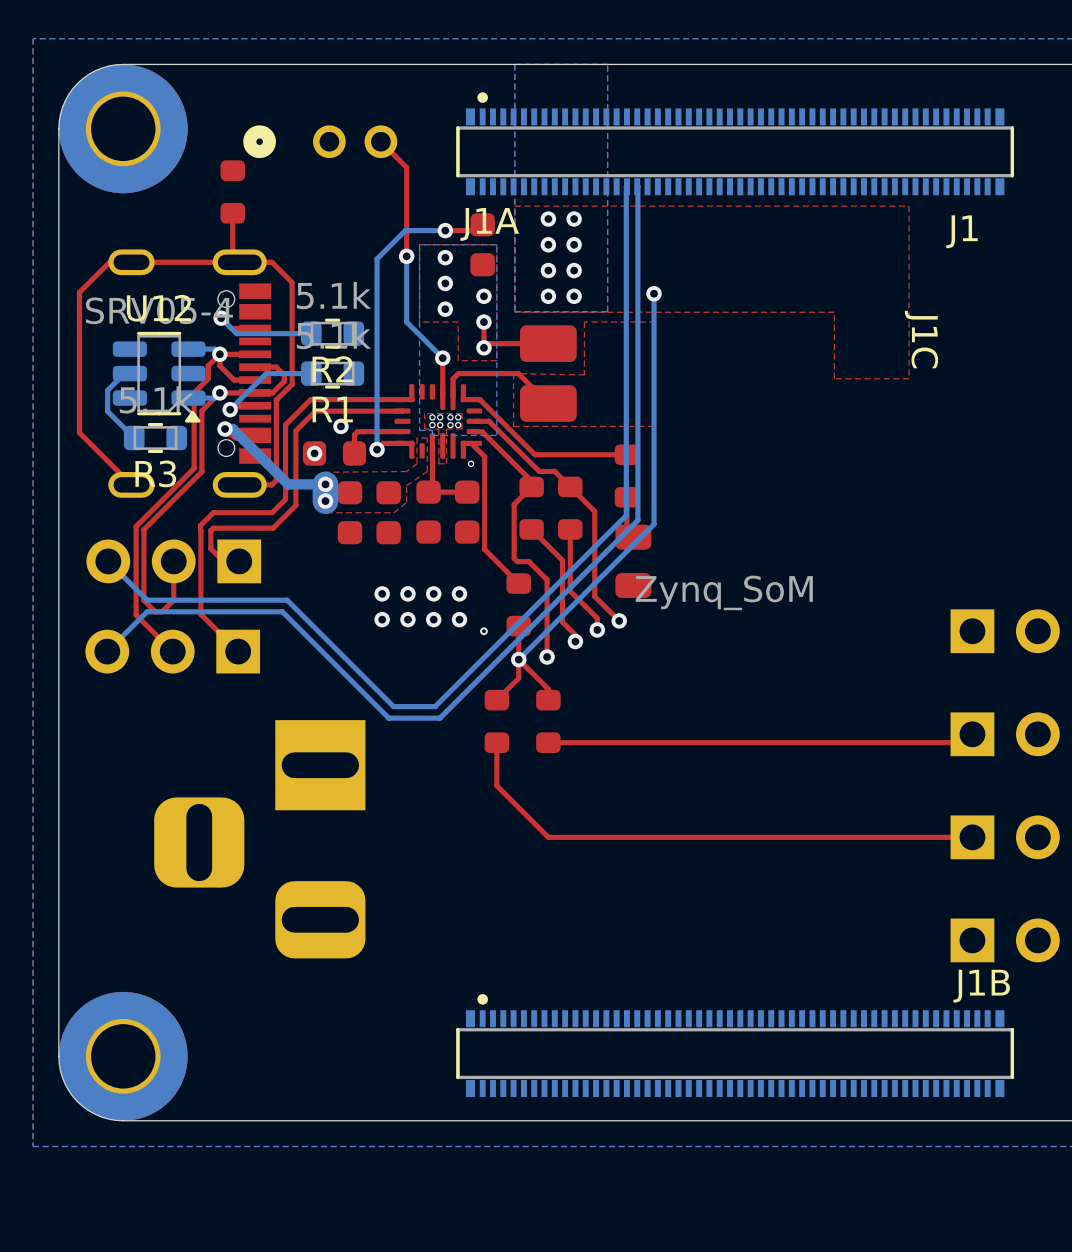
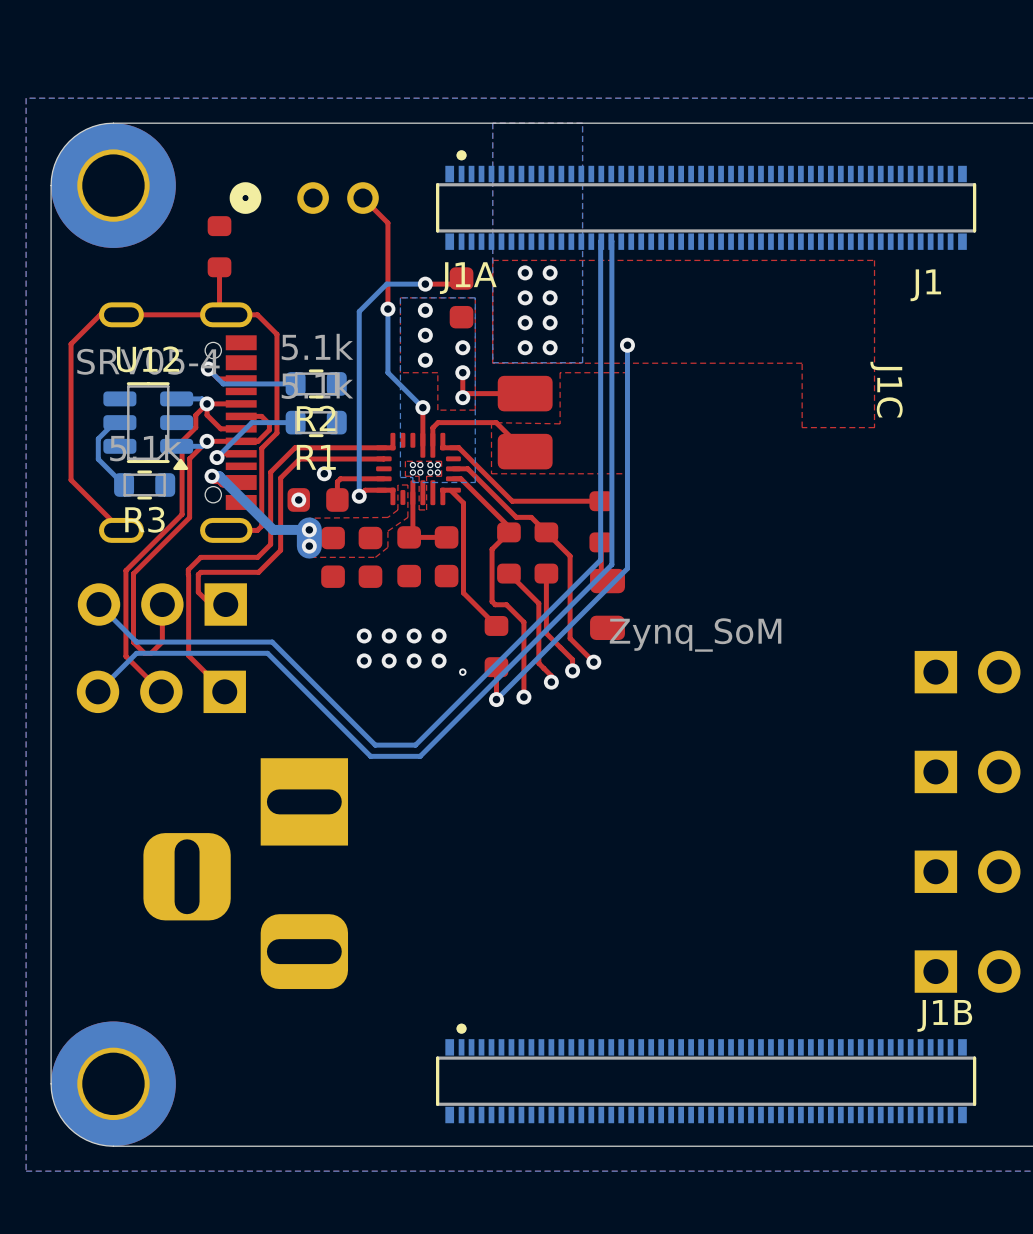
via: (471, 463) -> none
top track: (548, 700) (548, 689) (518, 659) (518, 678) (496, 700) -> none
part: (496, 721) -> none
part: (548, 721) -> none
top track: (972, 734) (964, 742) (548, 742) -> none
top track: (496, 742) (496, 785) (548, 837) (972, 837) -> none

